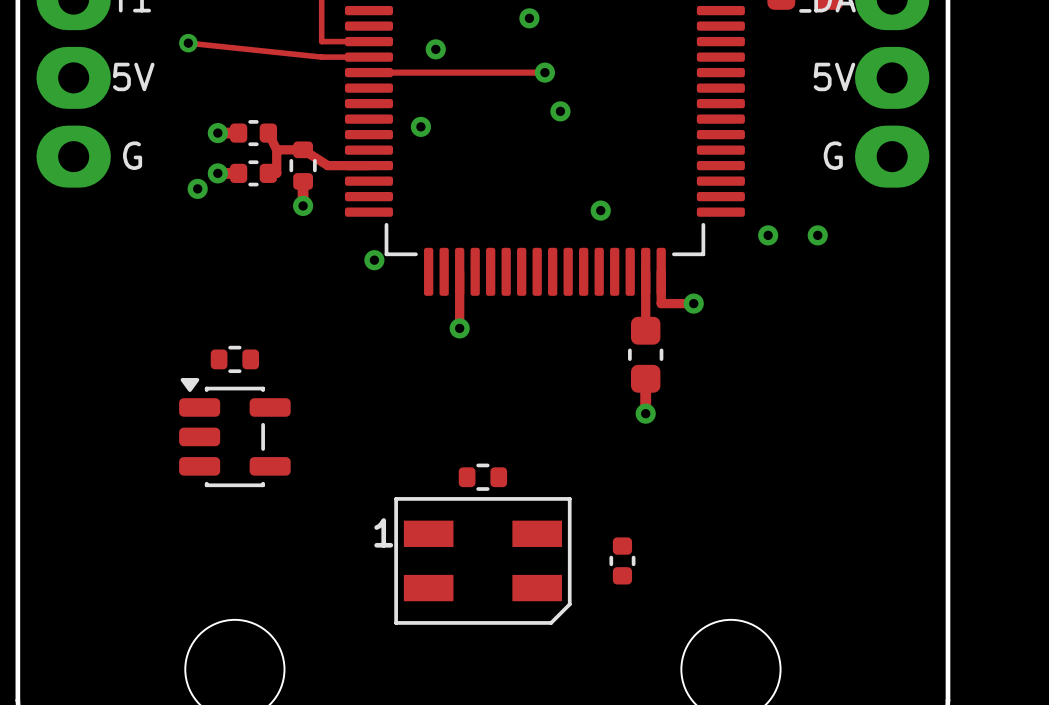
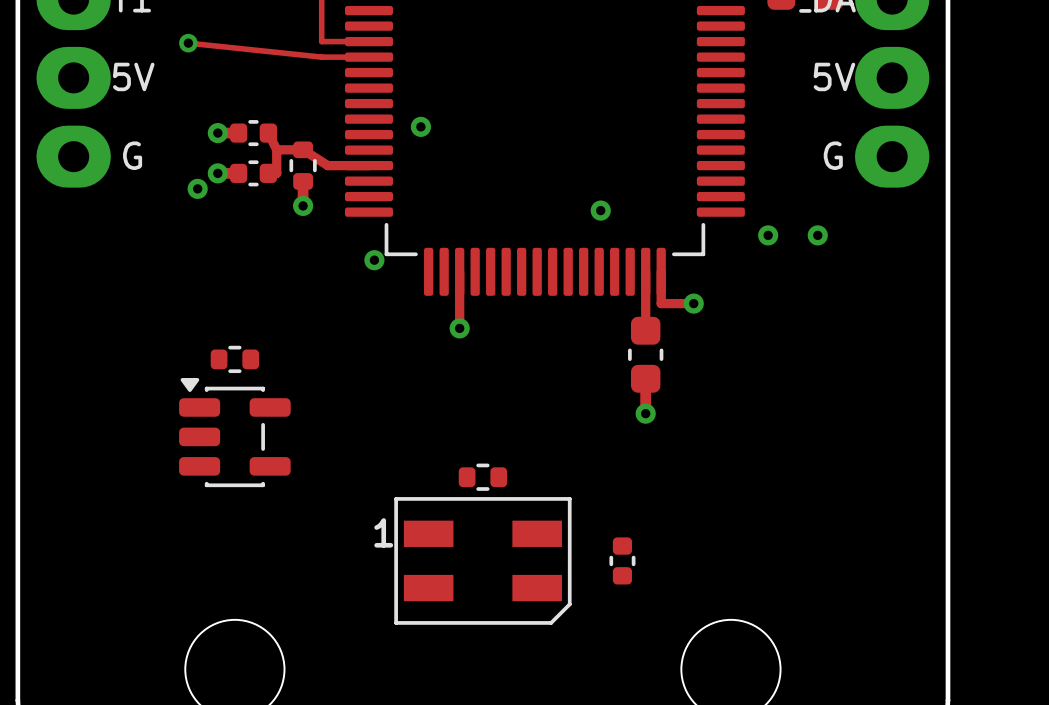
via: (529, 18) -> none
via: (435, 49) -> none
track: (368, 72) (544, 72) -> none
via: (544, 72) -> none
via: (560, 111) -> none

